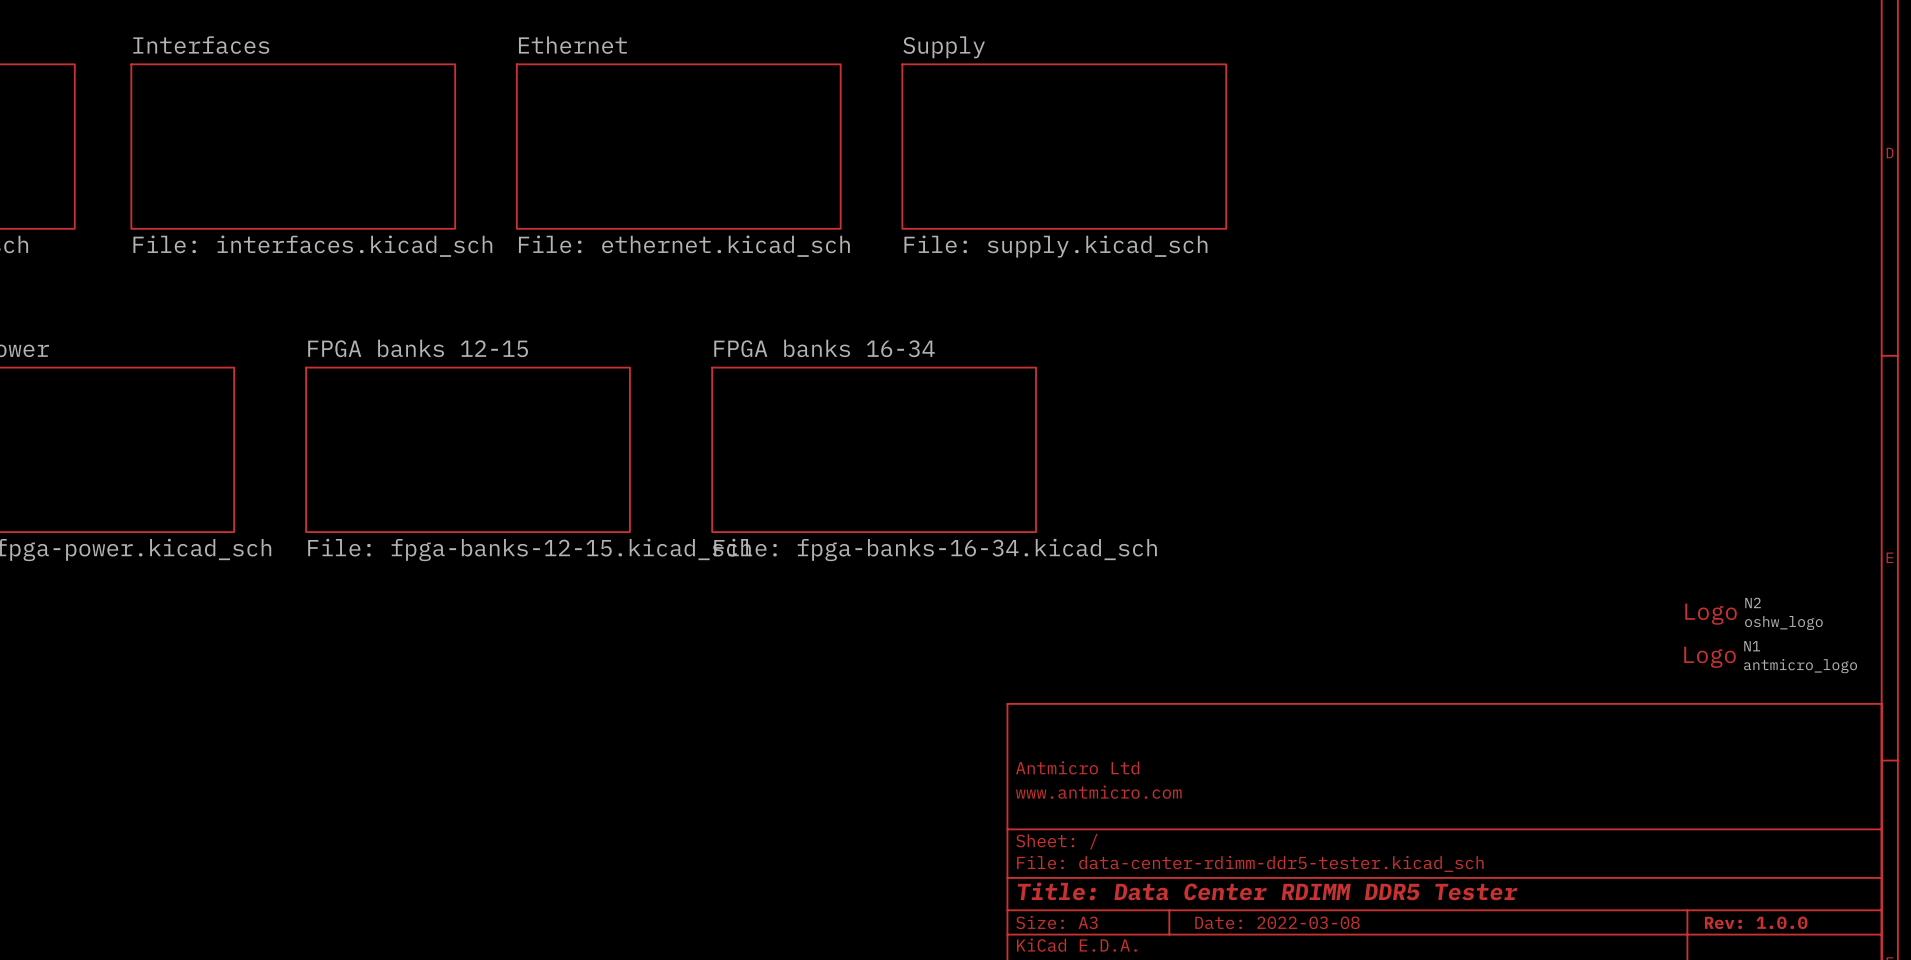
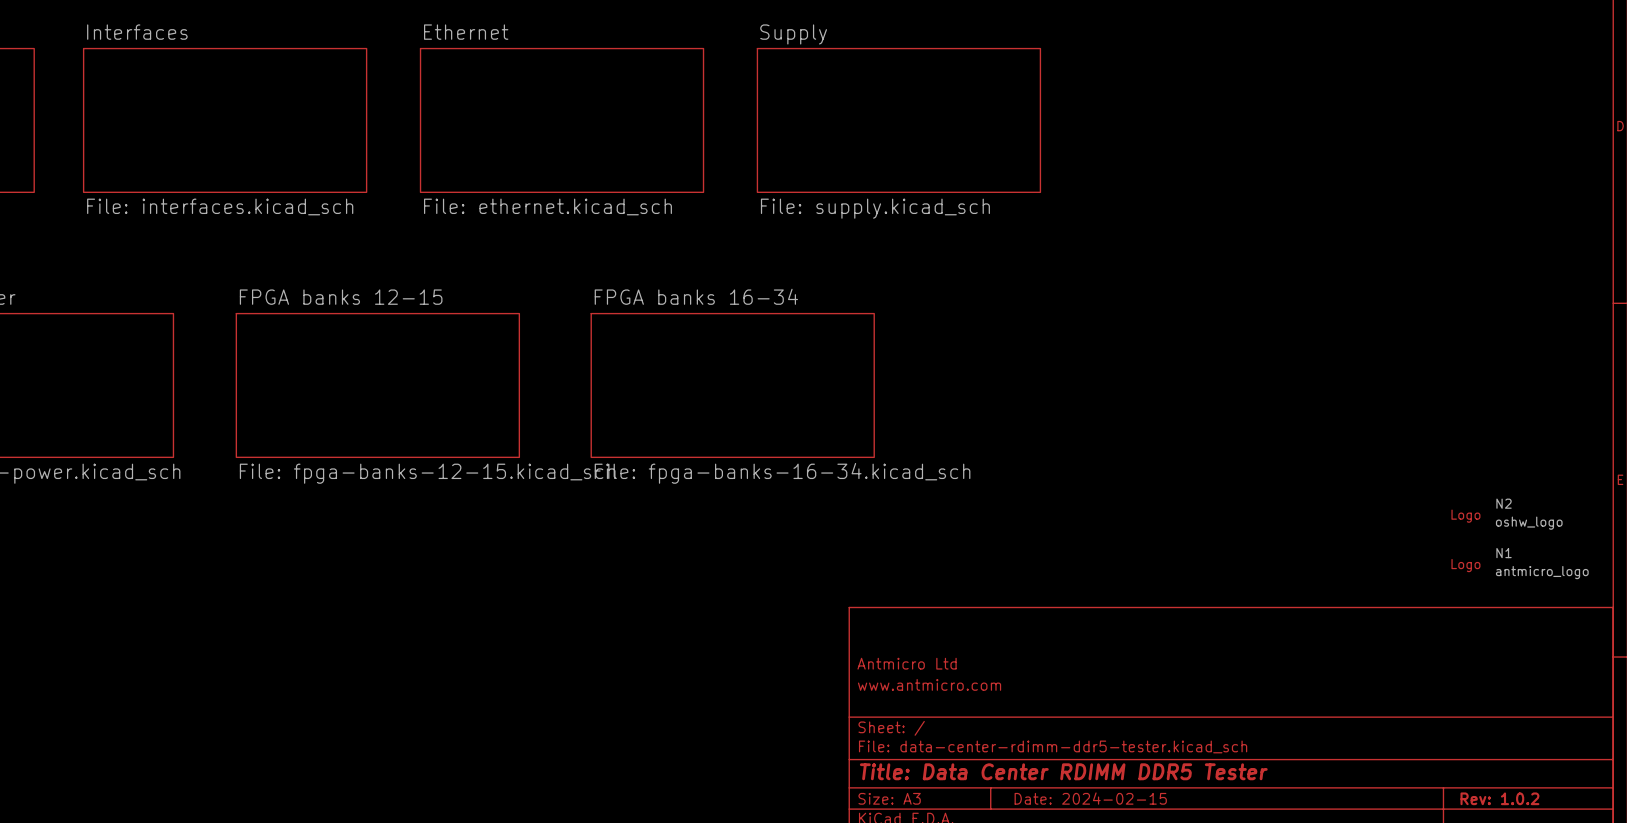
N2 symbol: [1685, 597, 1823, 631] -> [1451, 498, 1563, 530]
N1 symbol: [1684, 641, 1858, 674] -> [1451, 548, 1589, 580]
title block: Date: 2022-03-08 (1277, 922) -> Date: 2024-02-15 (1090, 798)
title block: Rev: 1.0.0 (1756, 922) -> Rev: 1.0.2 (1499, 798)

